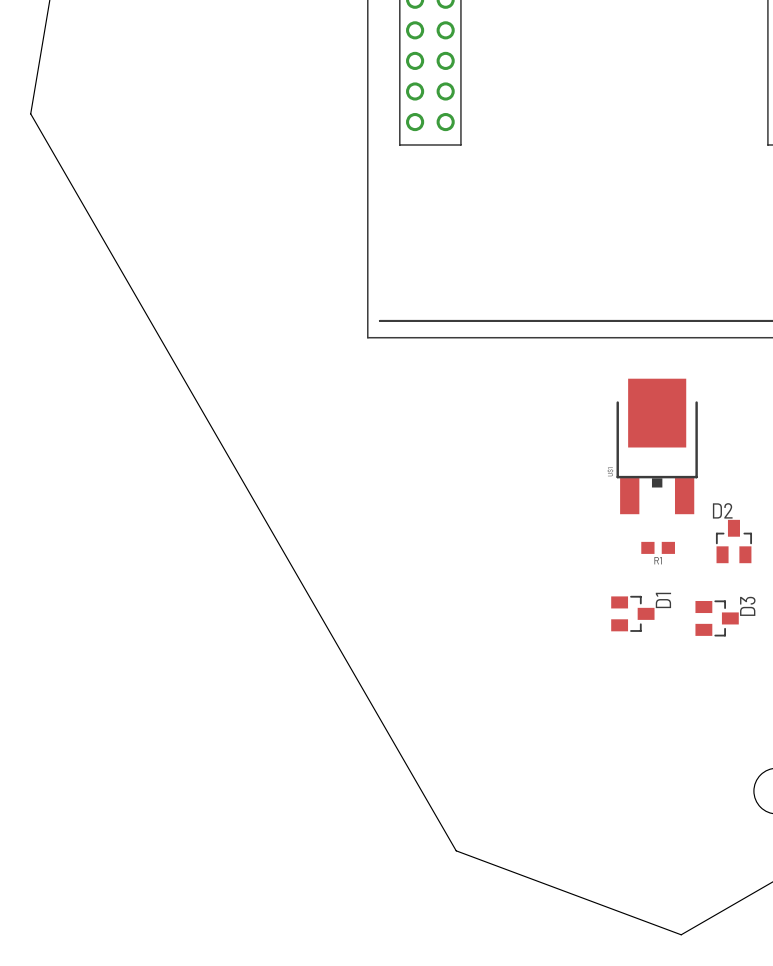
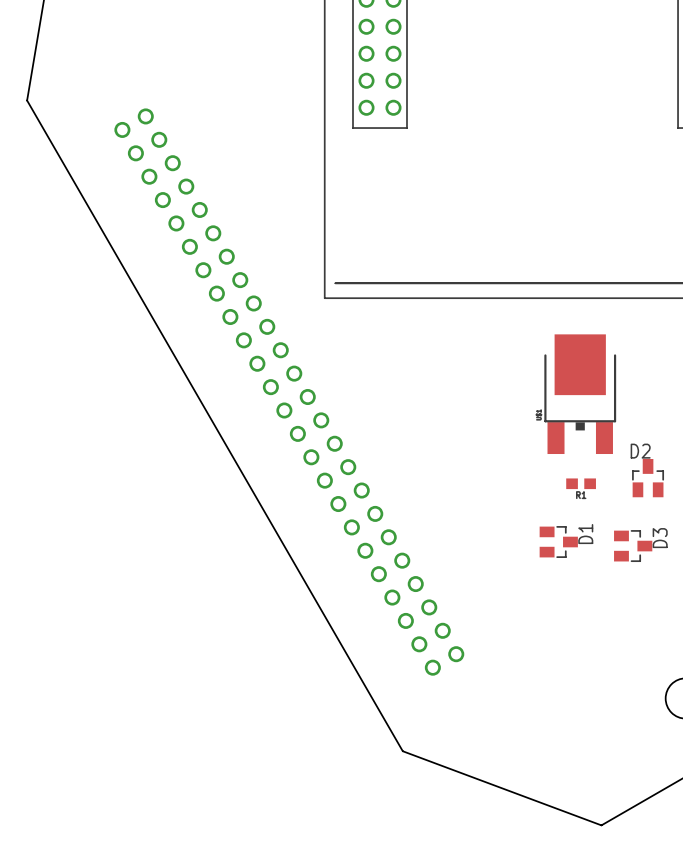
part: none -> (289, 392)

